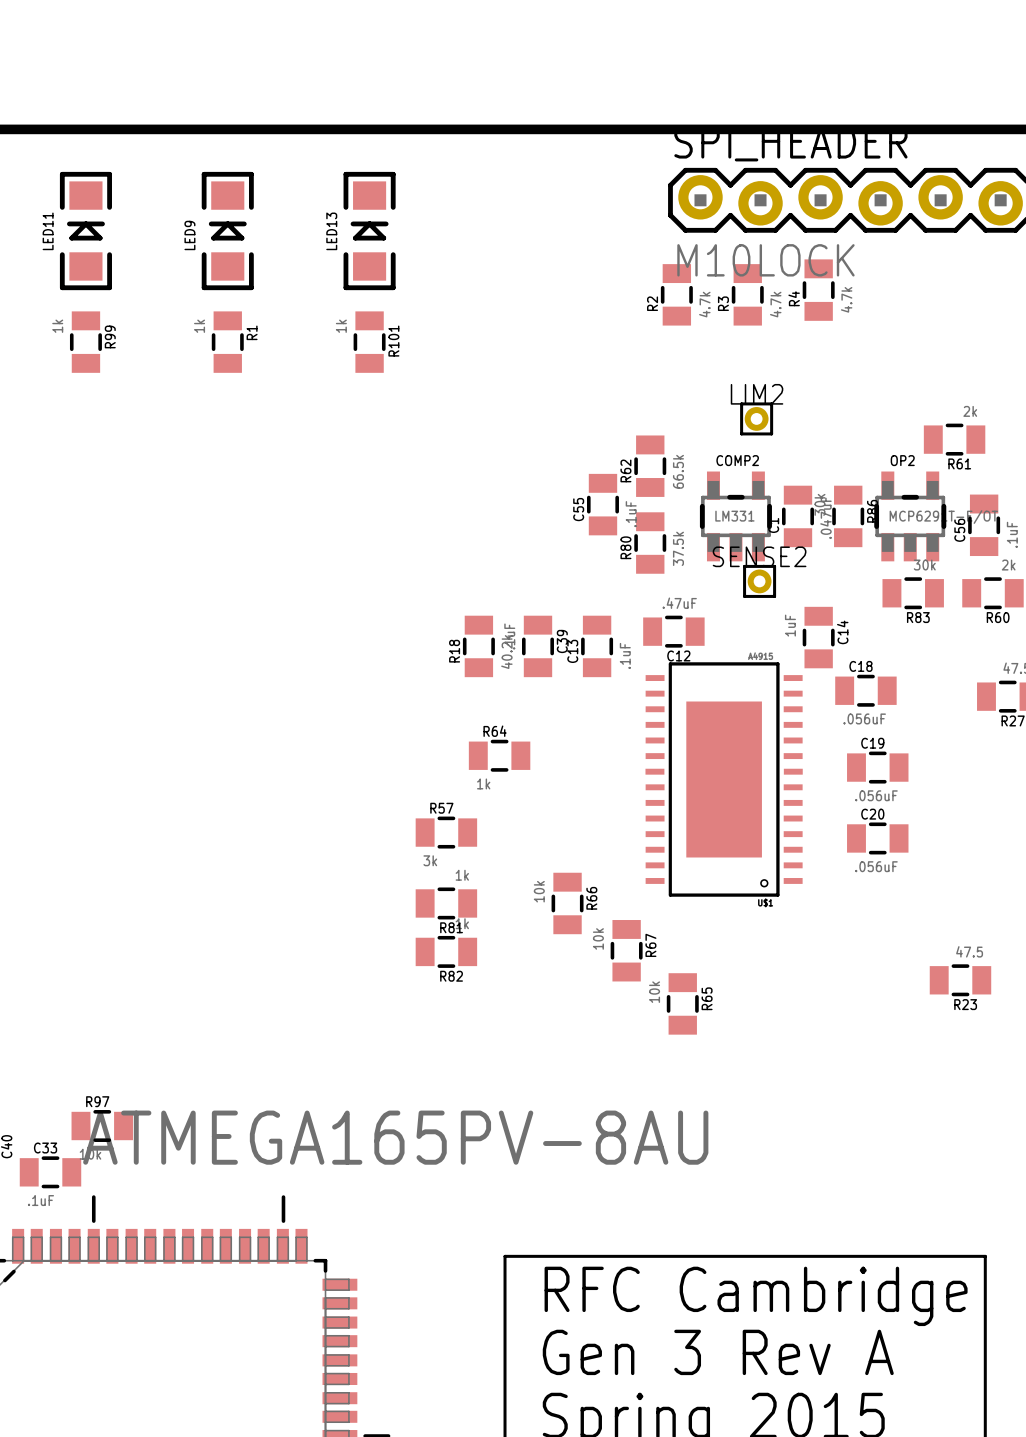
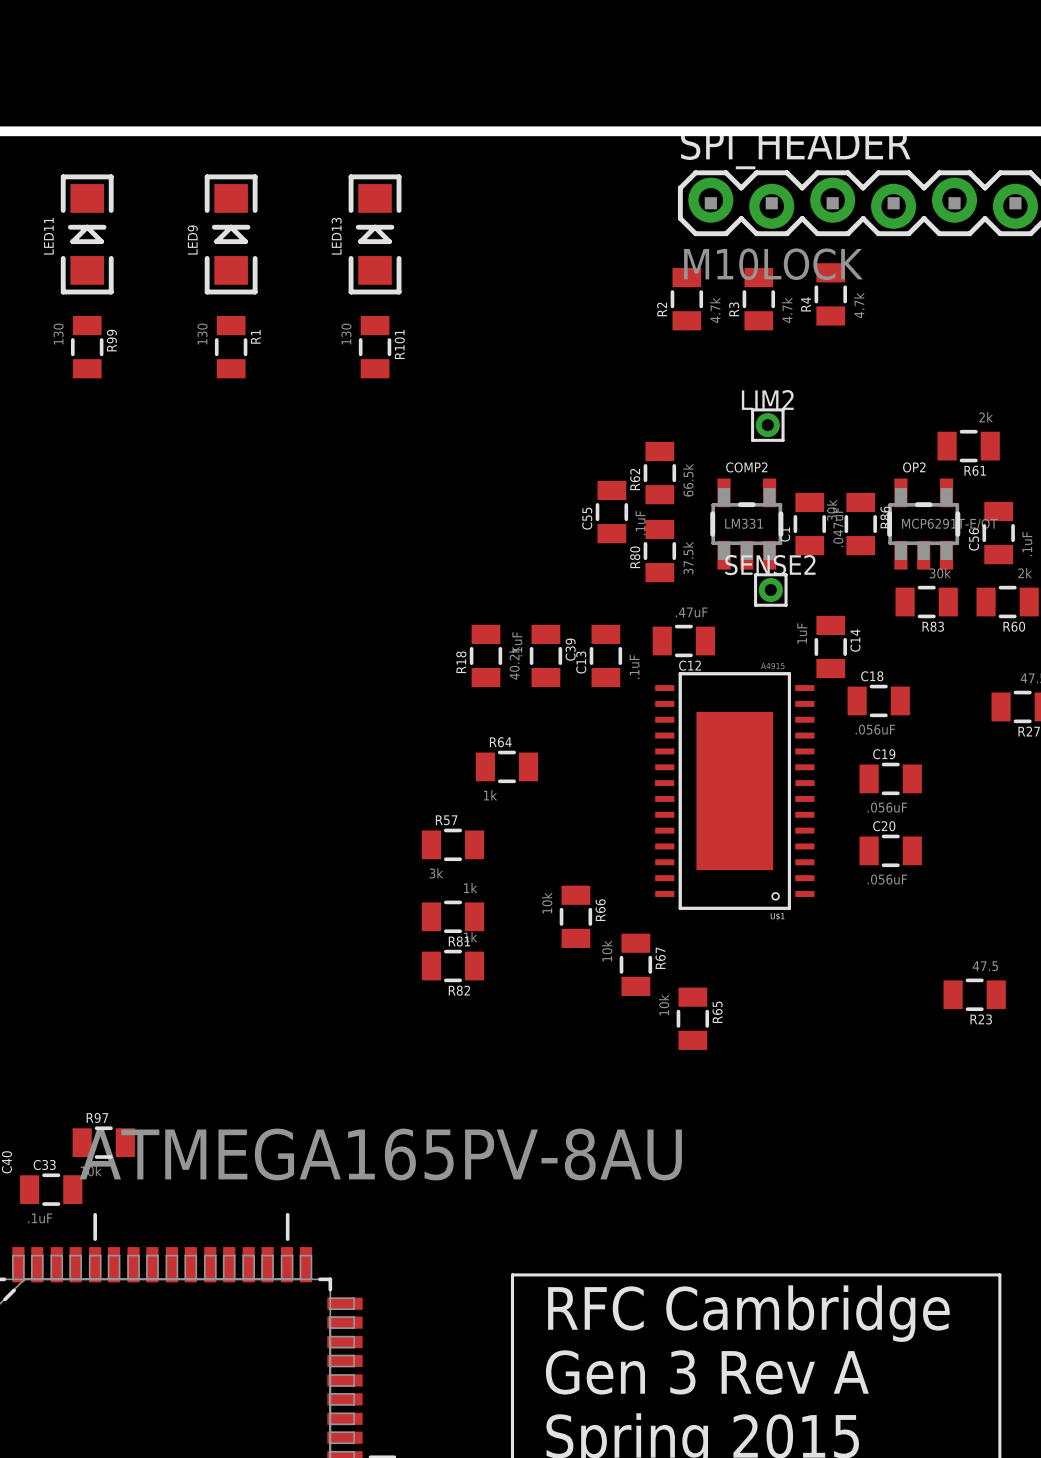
R99 value: 1k (57, 326) -> 130 (58, 334)
R1 value: 1k (199, 326) -> 130 (202, 334)
R101 value: 1k (341, 326) -> 130 (346, 334)

